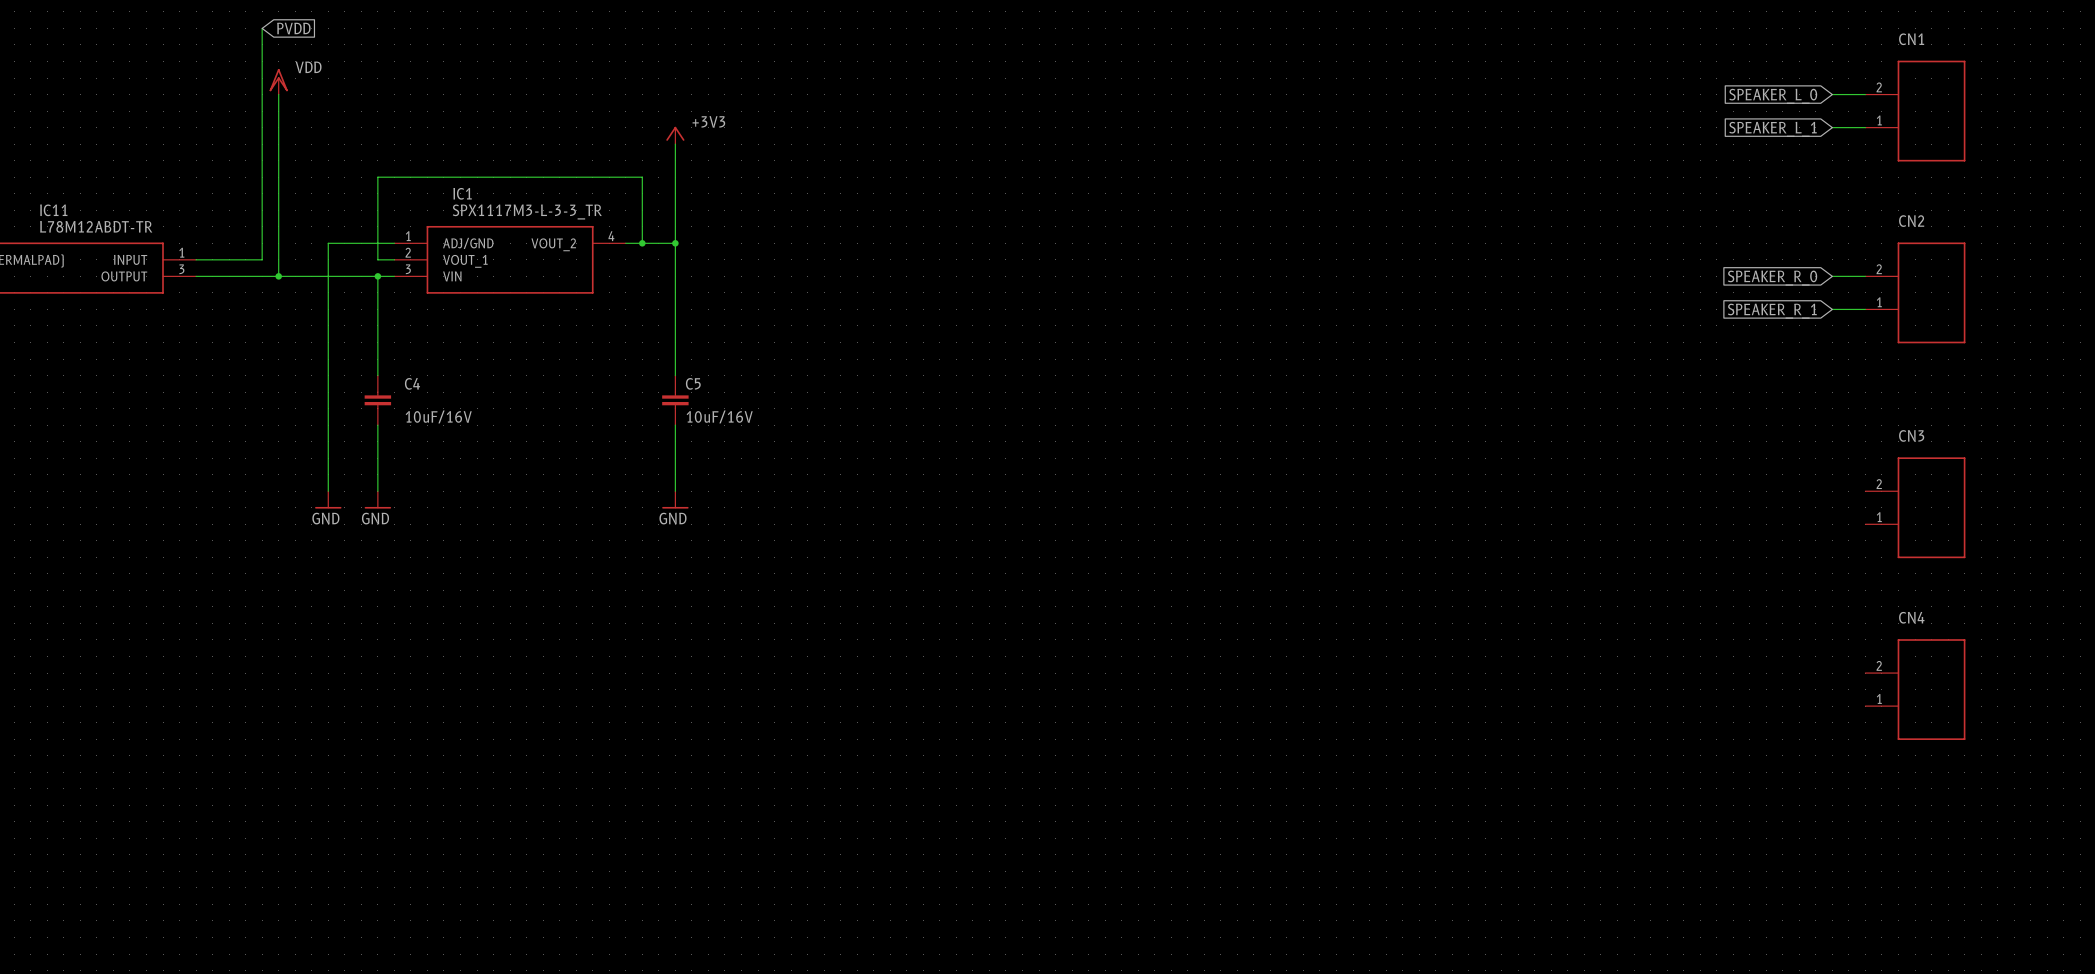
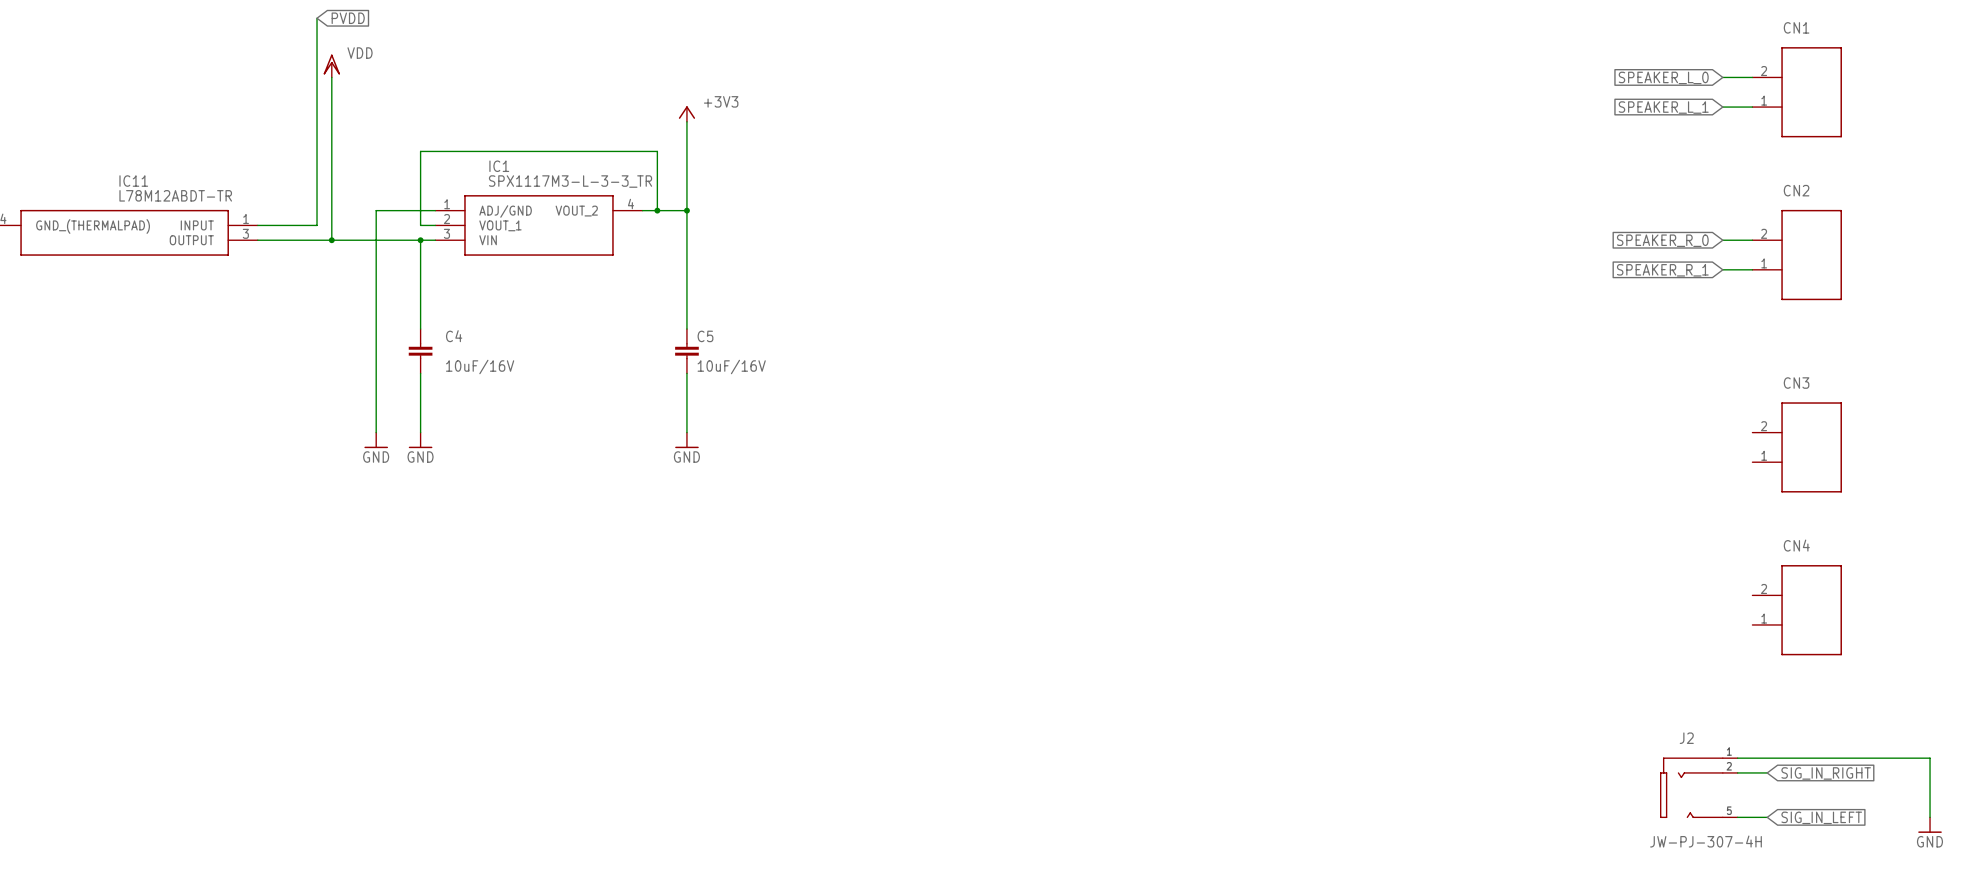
wire: none -> (1737, 758) (1930, 758) (1930, 817)
wire: none -> (1737, 772) (1767, 772)
global label: none -> SIG_IN_RIGHT (1826, 773)
J2: none -> JW-PJ-307-4H (1698, 787)
wire: none -> (1737, 817) (1767, 817)
global label: none -> SIG_IN_LEFT (1821, 817)
power symbol: none -> GND (1930, 825)

